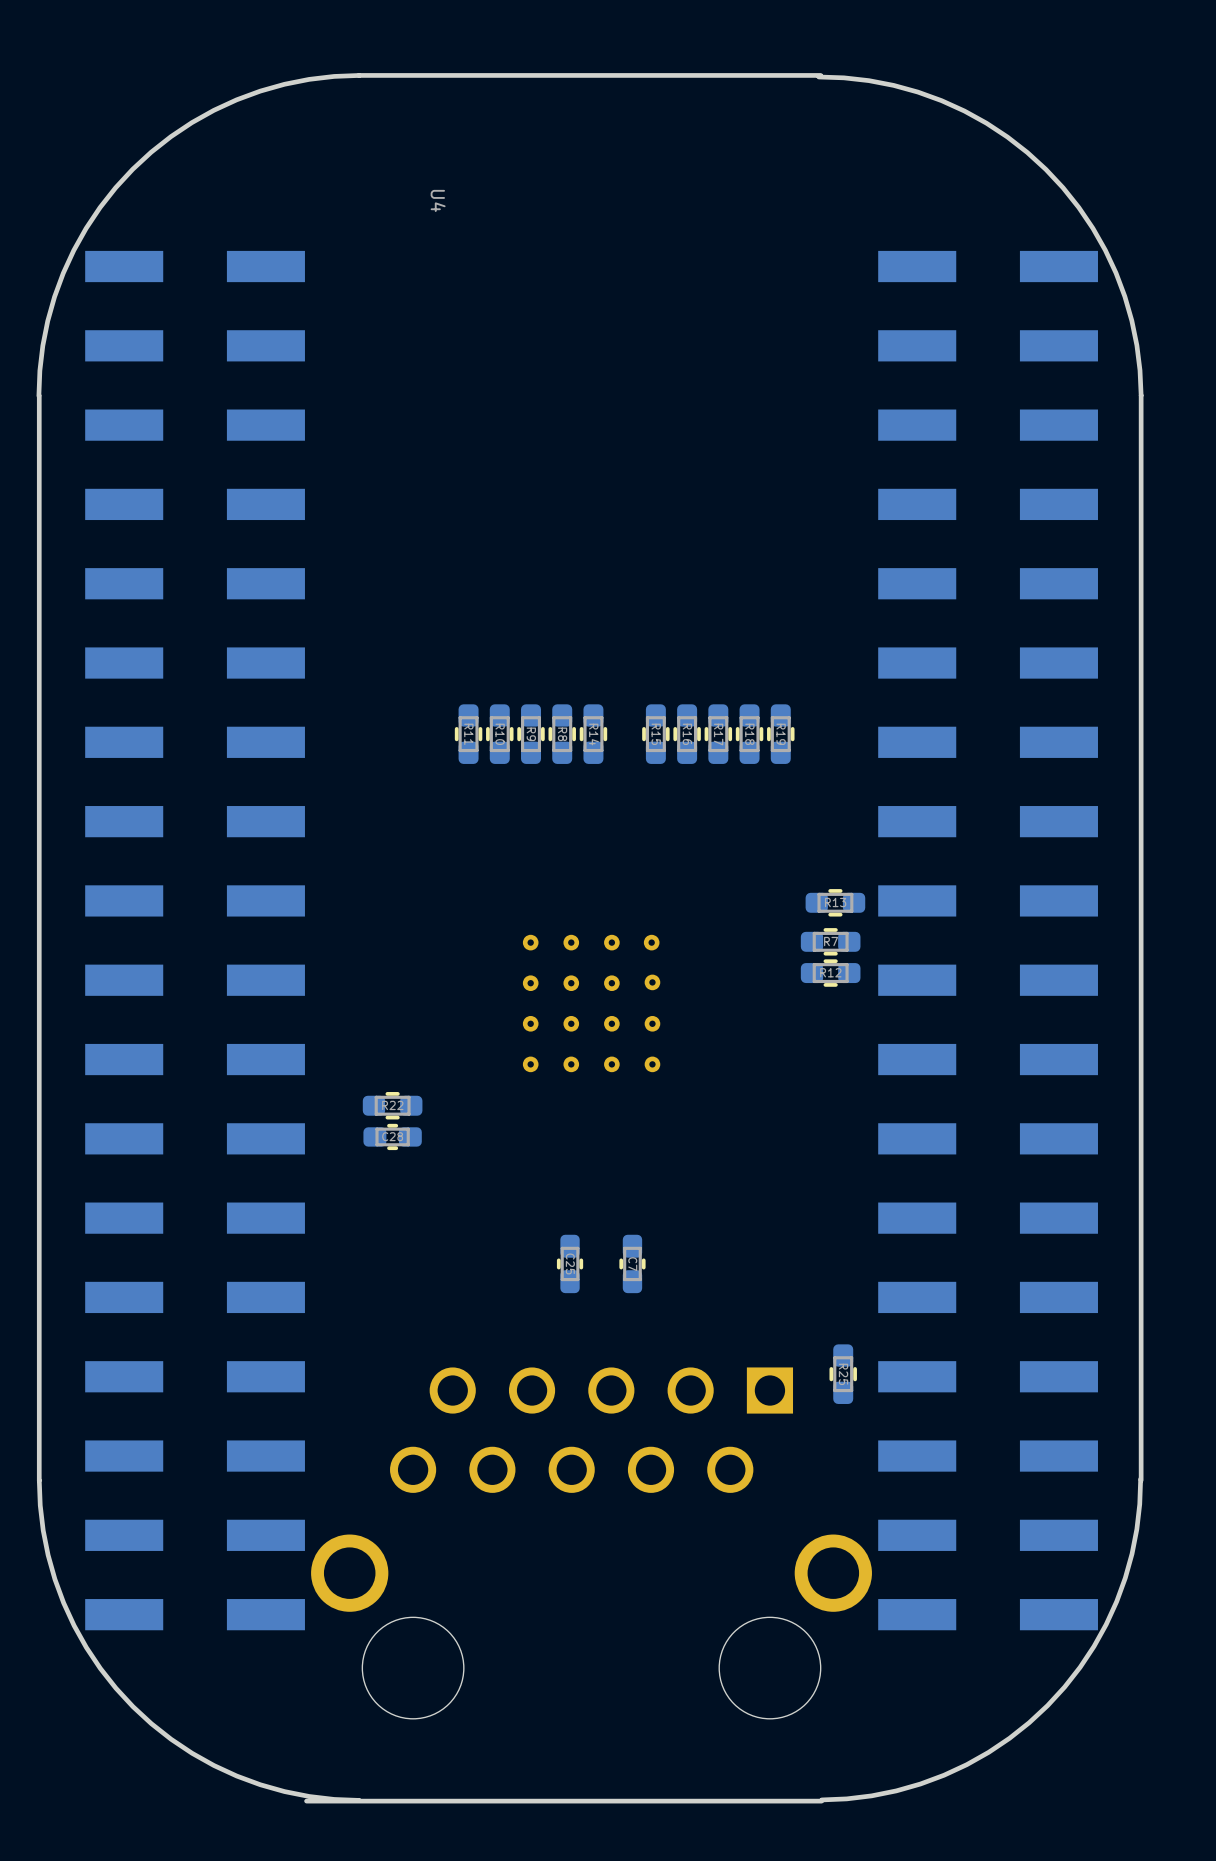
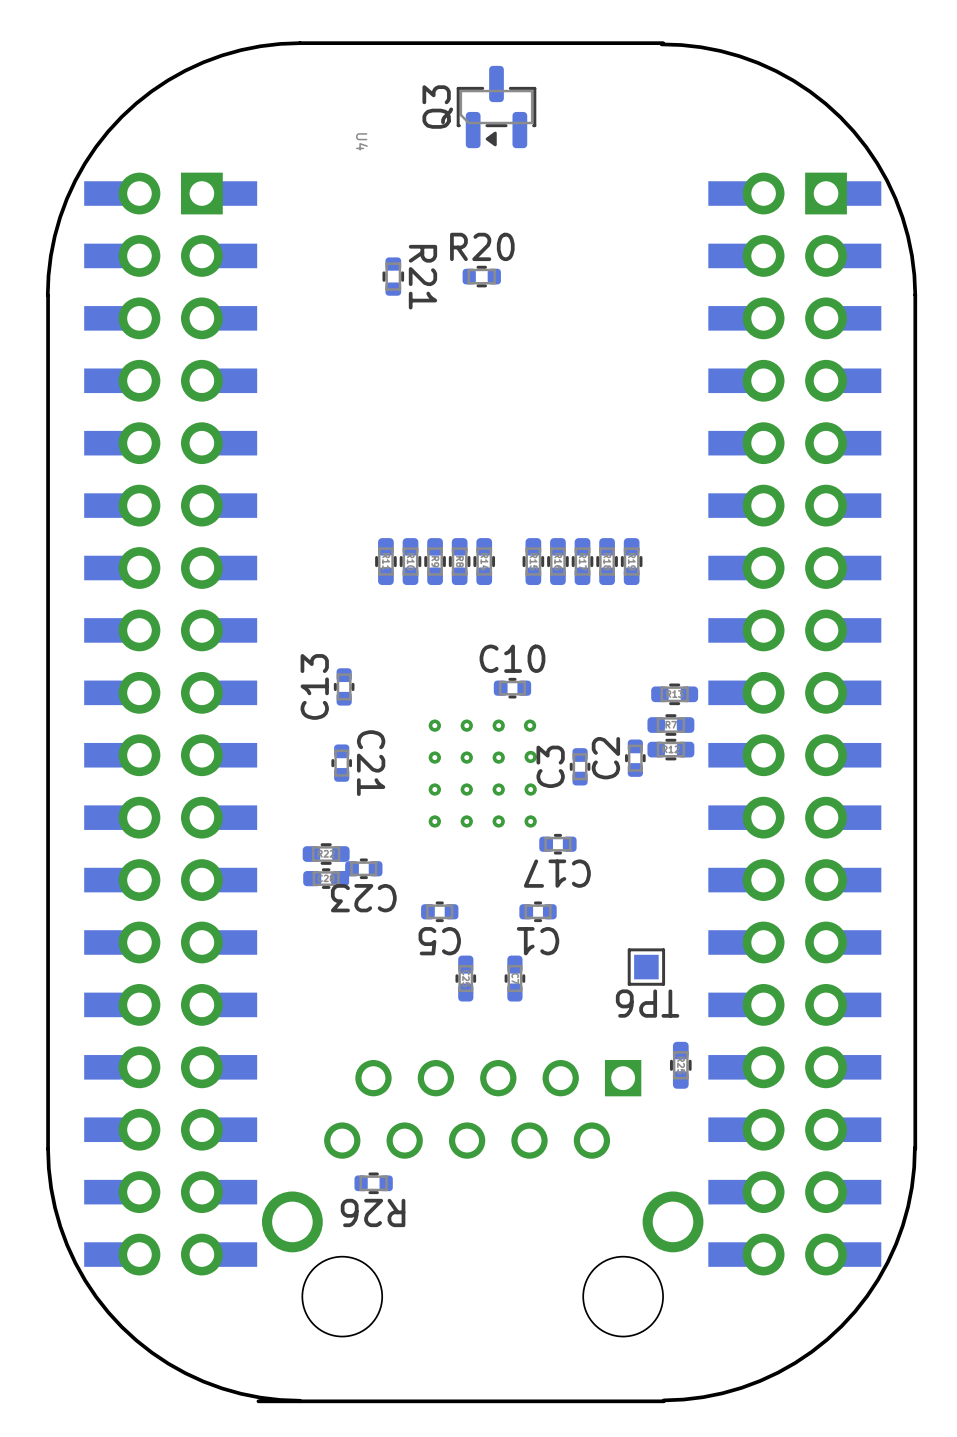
Q3: none -> (496, 107)
R21: none -> (393, 276)
R20: none -> (481, 276)
C13: none -> (344, 686)
C10: none -> (512, 688)
part: none -> (170, 724)
part: none -> (794, 724)
C2: none -> (635, 758)
C21: none -> (341, 763)
C3: none -> (580, 766)
C17: none -> (557, 844)
C23: none -> (363, 868)
C5: none -> (439, 911)
C1: none -> (538, 911)
TP6: none -> (646, 967)
R26: none -> (373, 1183)

